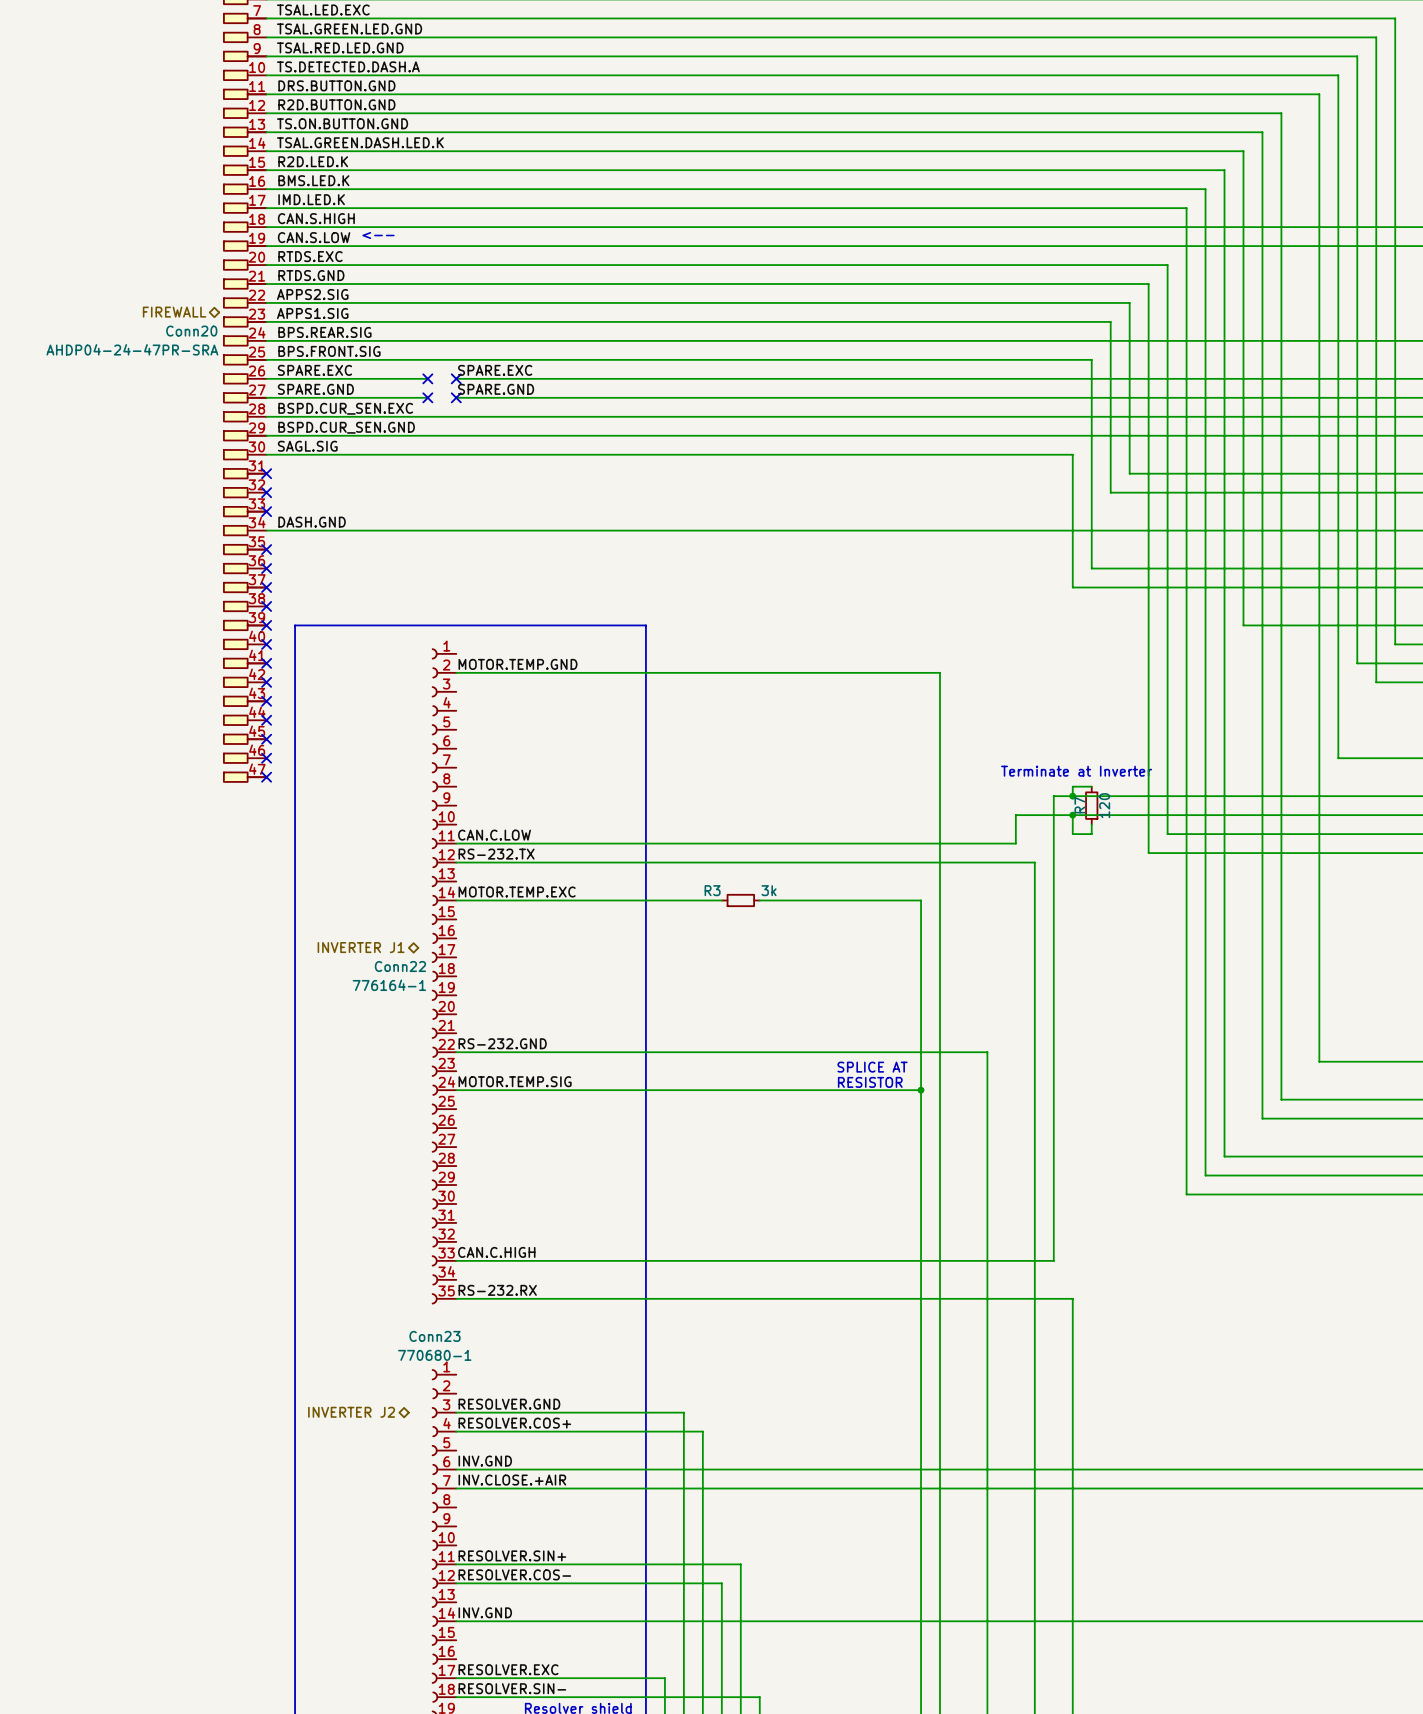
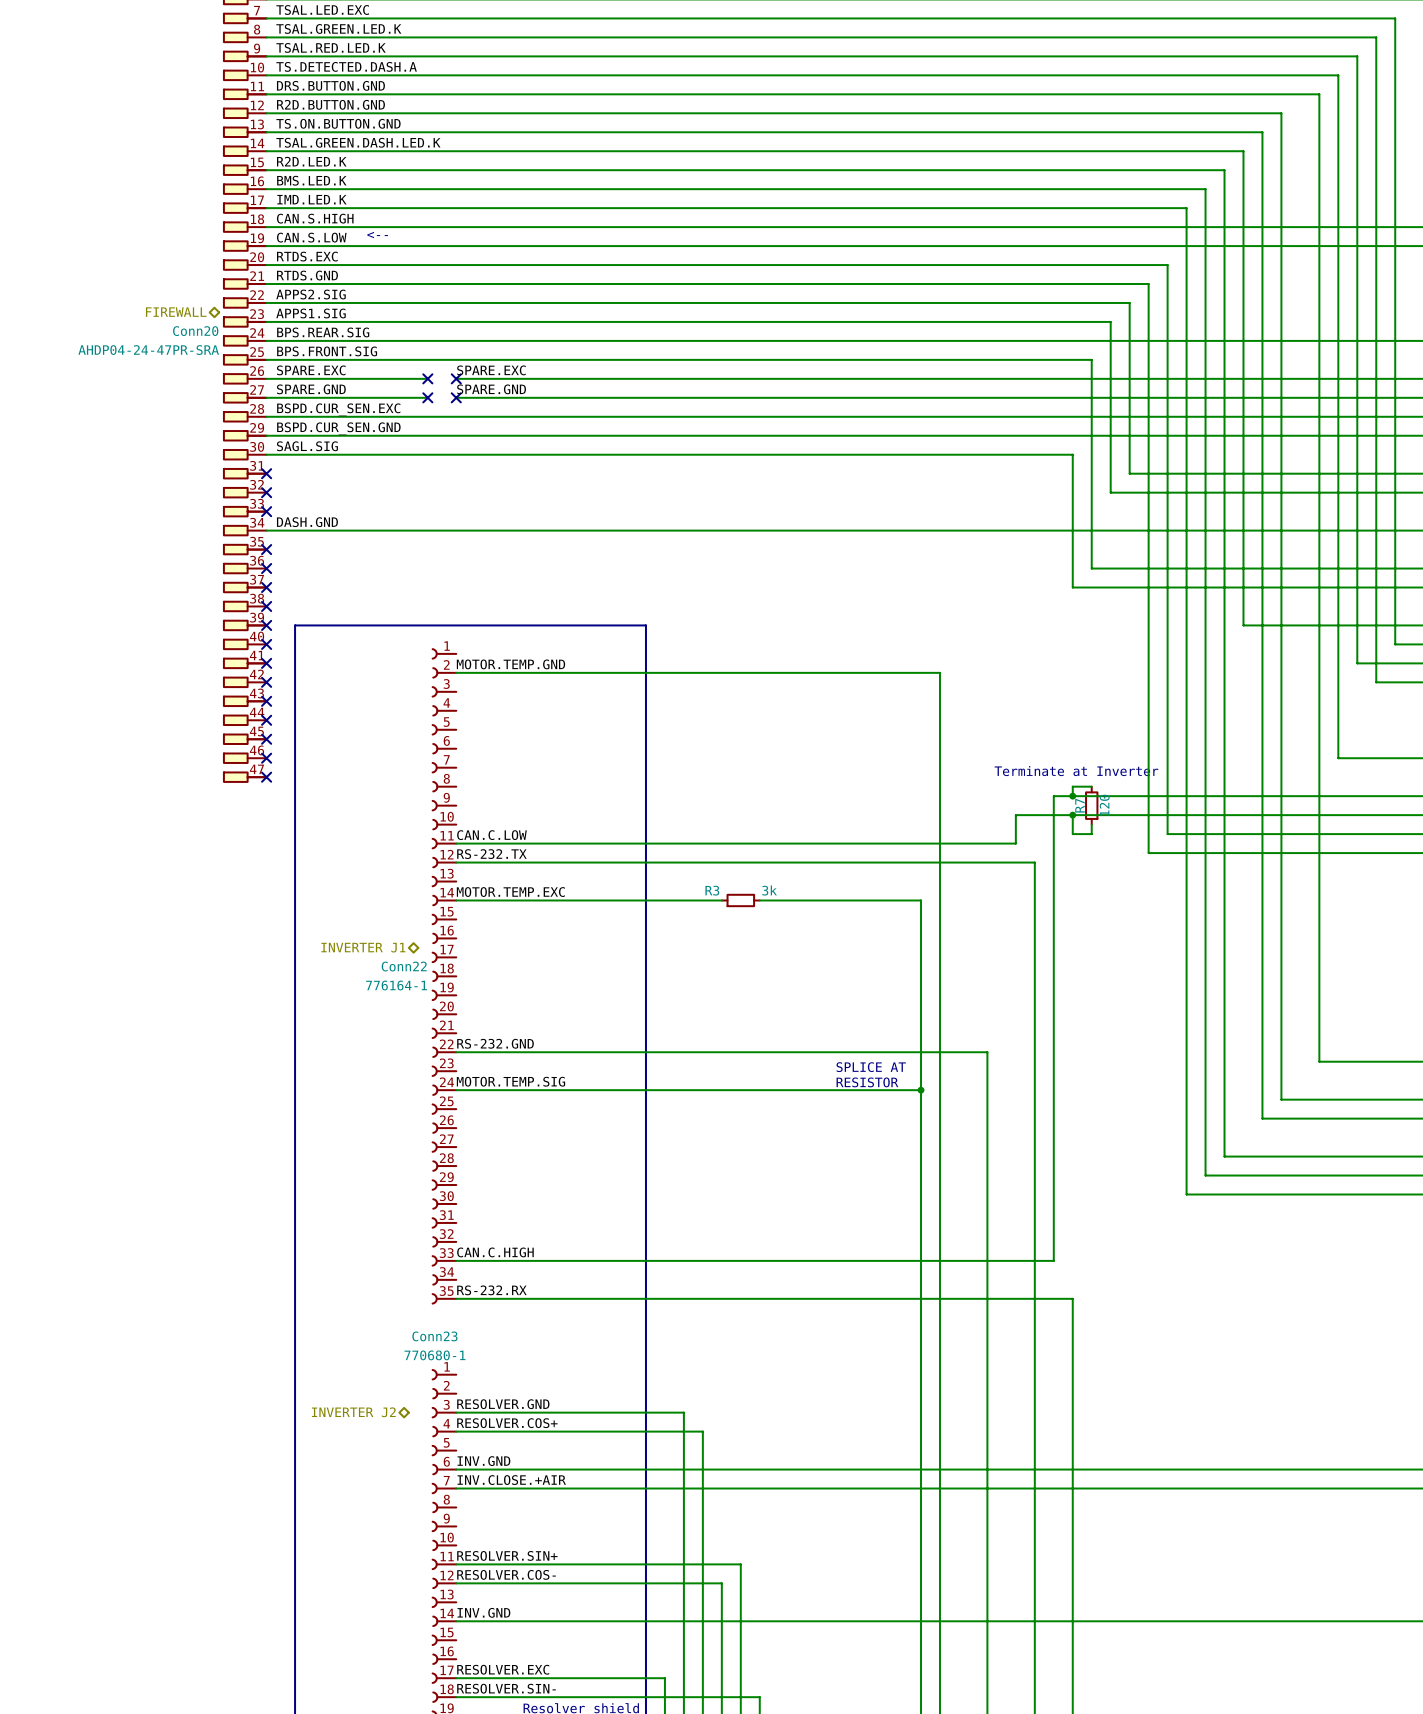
label: TSAL.GREEN.LED.GND (349, 28) -> TSAL.GREEN.LED.K (338, 28)
label: TSAL.RED.LED.GND (340, 47) -> TSAL.RED.LED.K (331, 47)

